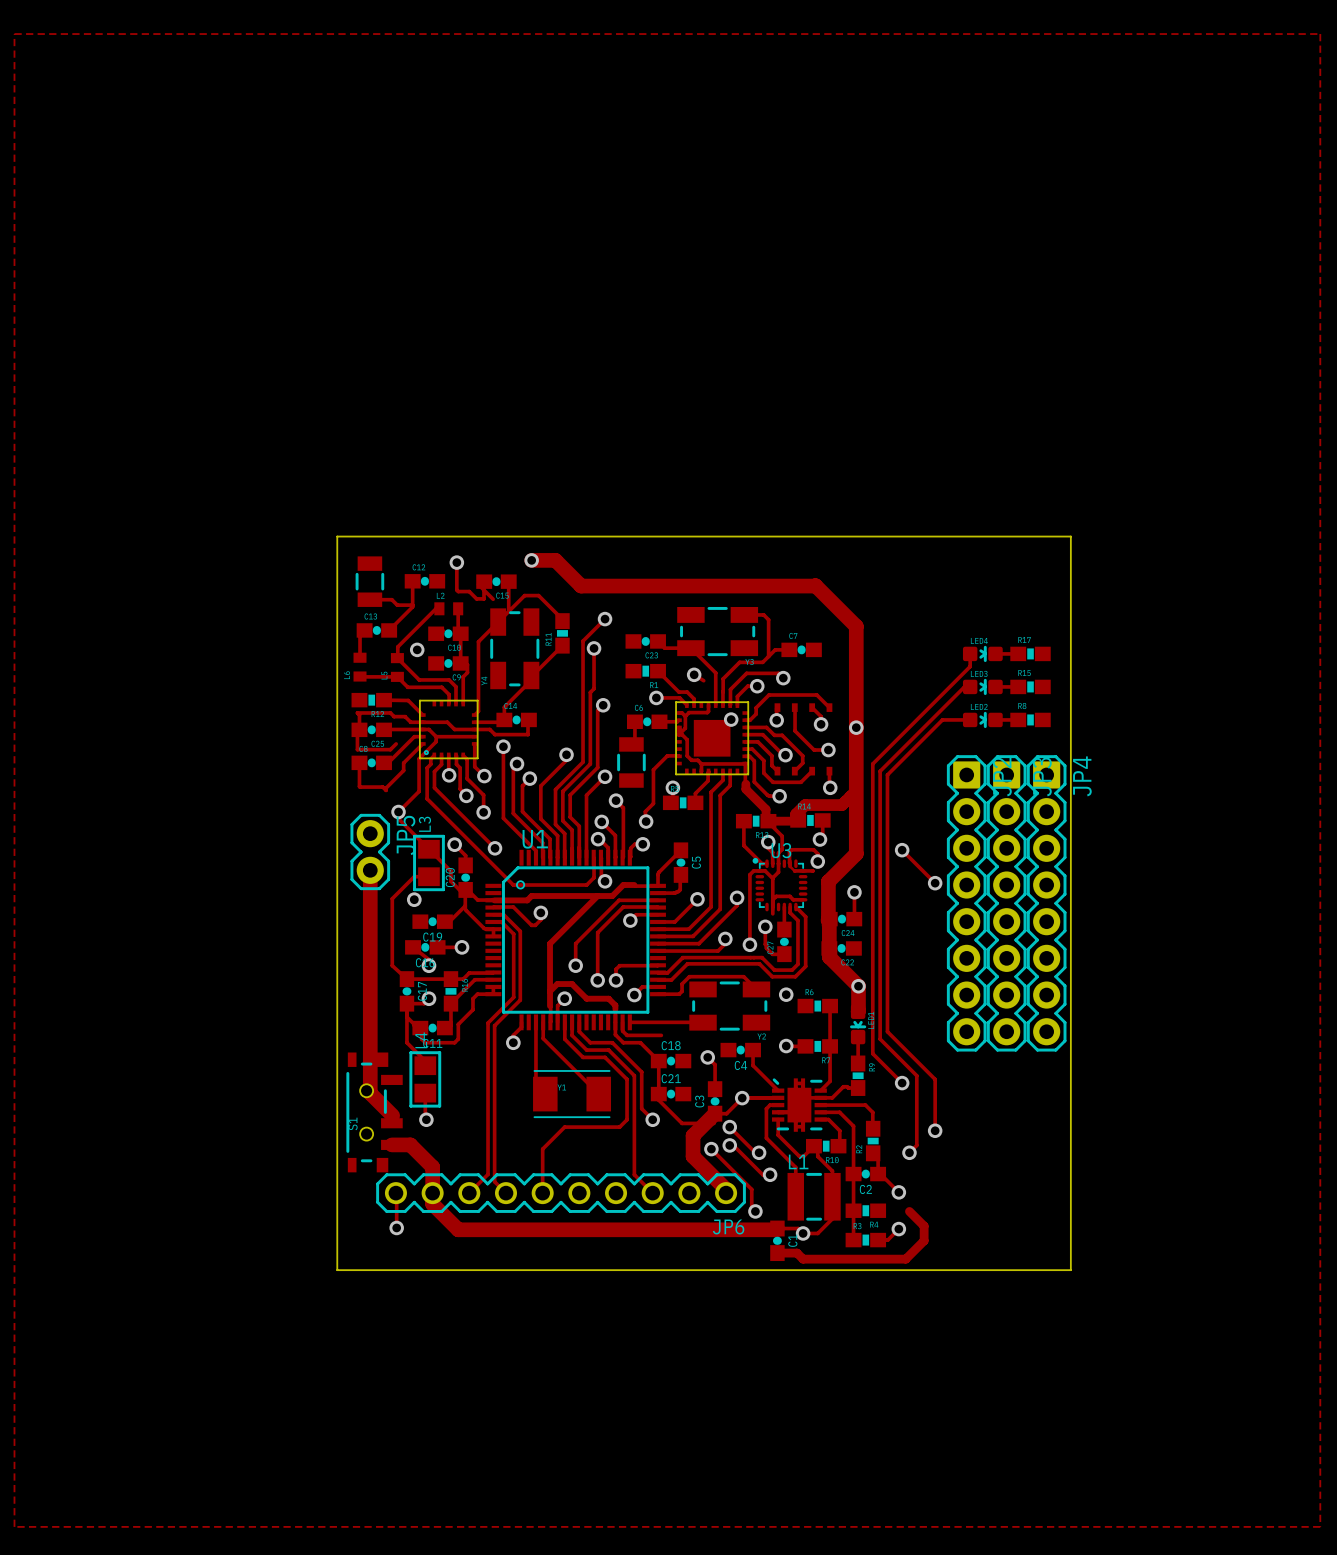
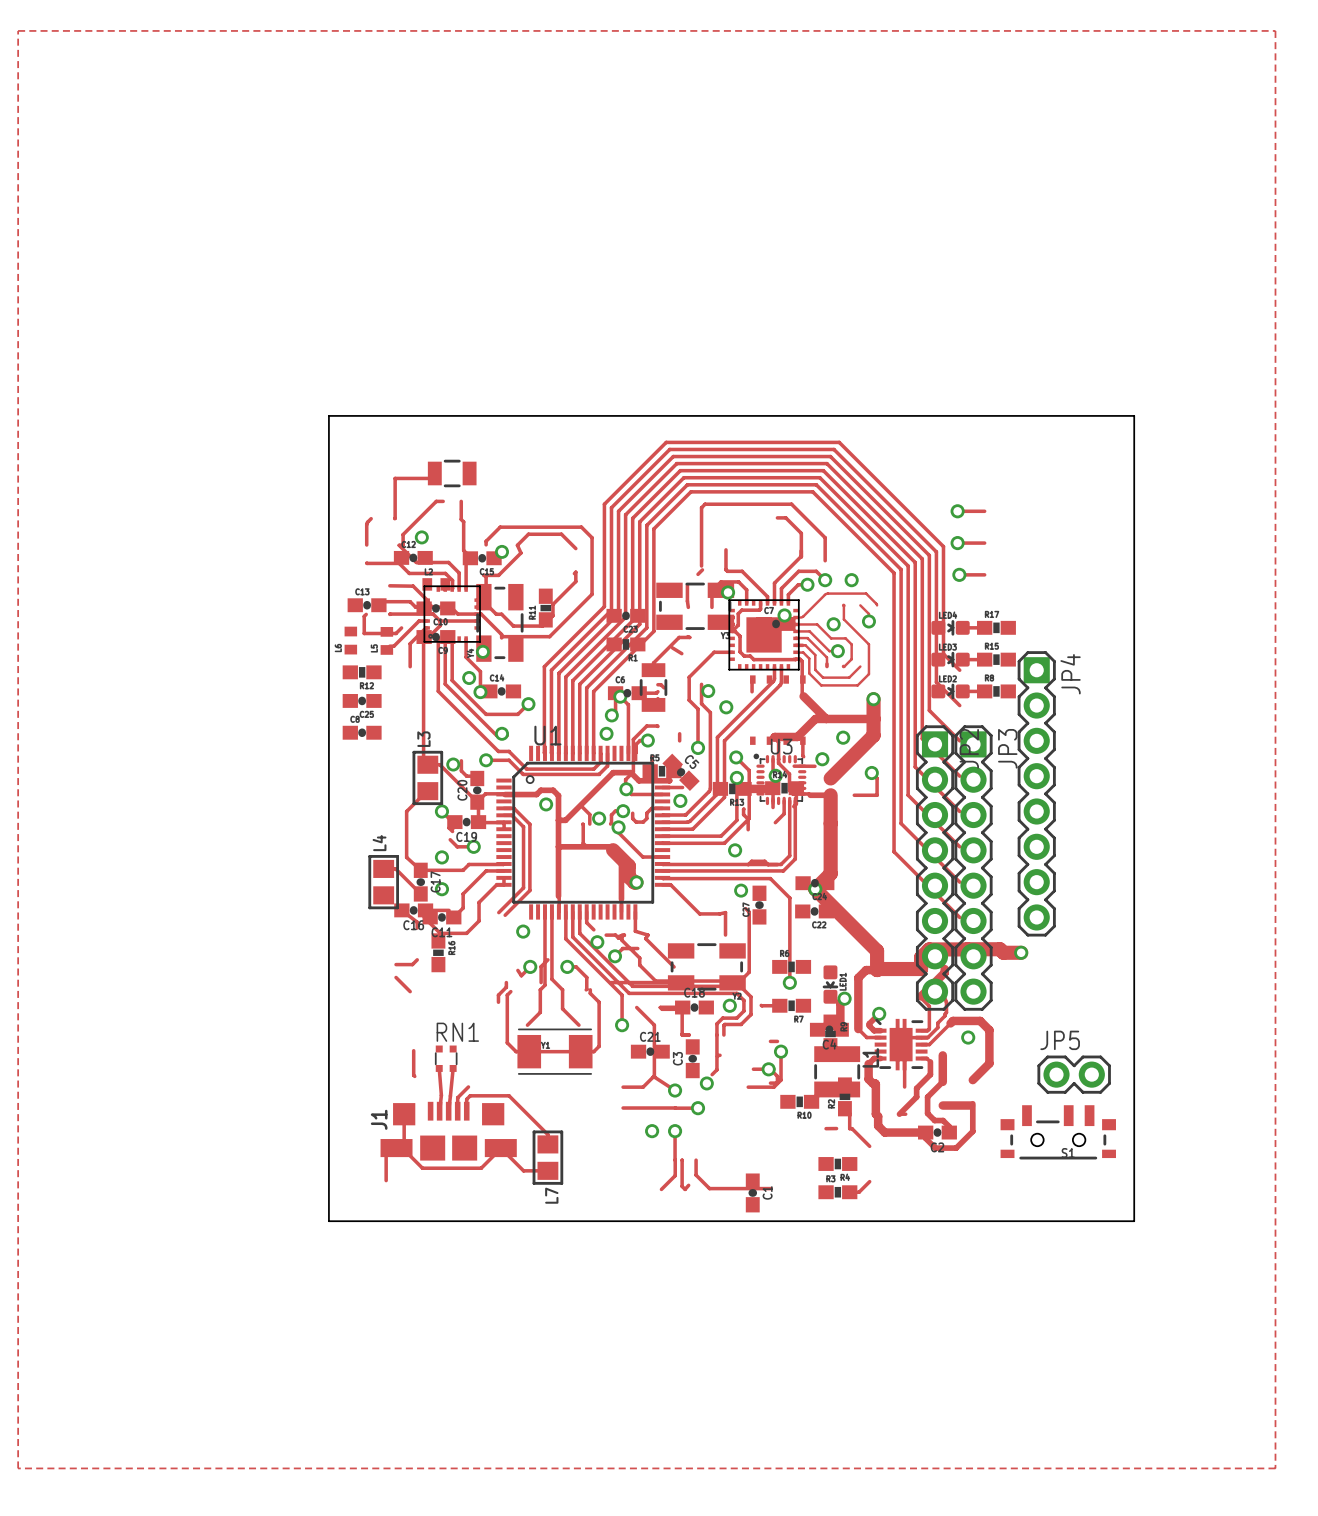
track: none -> (434, 473) (429, 478) (395, 478) (394, 518)
track: none -> (443, 501) (436, 501) (403, 534) (403, 544) (399, 545) (416, 562) (448, 562) (459, 572) (459, 589)
track: none -> (461, 501) (463, 550) (466, 552) (466, 589)
track: none -> (957, 511) (984, 511)
via: none -> (957, 511)
board edge: (337, 536) (1070, 536) (1070, 1270) -> (328, 514) (328, 415) (1134, 415) (1134, 1221) (1035, 1221)
track: none -> (777, 517) (785, 517) (801, 533) (801, 556) (774, 583) (774, 602)
track: (531, 560) (555, 560) (581, 586) (815, 585) (856, 626) (856, 853) (828, 881) (828, 920) -> none
via position: (531, 560) -> (502, 551)
track: (456, 562) (458, 591) (469, 591) (476, 598) (483, 598) (483, 580) -> none
via position: (456, 562) -> (421, 537)
track: none -> (957, 543) (984, 543)
via: none -> (957, 543)
track: none -> (486, 544) (486, 541) (500, 527) (581, 527) (592, 537) (592, 594) (549, 636) (502, 636)
track: none -> (575, 548) (561, 534) (528, 534) (517, 545) (520, 553) (498, 575) (483, 575) (486, 576) (486, 597) (483, 600) (477, 600)
track: none -> (725, 549) (725, 569) (742, 571) (767, 596) (767, 602)
part rotation: 0° (369, 581) -> 90° clockwise (452, 473)
part position: (369, 581) -> (452, 473)
track: (412, 581) (412, 606) (389, 630) -> none
track: (508, 581) (508, 611) -> none
track: (478, 584) (493, 599) -> none
track: none -> (825, 560) (825, 537) (791, 504) (705, 504) (701, 507) (701, 566)
track: none -> (366, 563) (399, 563) (409, 573) (445, 573) (452, 580) (452, 589)
track: none -> (702, 569) (698, 574)
track: none -> (574, 573) (575, 572) (575, 581) (552, 604) (552, 615) (542, 626) (513, 626) (501, 614) (496, 614) (489, 607) (477, 607)
track: none -> (959, 574) (984, 574)
via: none -> (959, 574)
track: (369, 599) (391, 599) (397, 605) (412, 605) -> none
track: none -> (825, 580) (816, 571) (798, 571) (781, 588) (781, 602)
via: none -> (825, 580)
via: none -> (851, 580)
track: (439, 608) (435, 608) (397, 646) (397, 658) (419, 679) (449, 679) (456, 686) (456, 703) -> none
track: (458, 608) (460, 663) (467, 664) (467, 672) (463, 676) (463, 703) -> none
track: none -> (687, 584) (688, 607)
via: none -> (807, 584)
track: (744, 614) (763, 614) (768, 619) (768, 656) -> none
via: none -> (728, 592)
track: (605, 619) (583, 641) (583, 762) (555, 789) (555, 824) (564, 833) (564, 857) -> none
via: (605, 619) -> none
track: (562, 621) (538, 595) (524, 595) (478, 641) (478, 711) (474, 715) -> none
track: none -> (378, 601) (410, 601) (415, 607) (450, 607) (457, 614) (481, 614) (501, 634) (501, 637)
track: none -> (746, 602) (746, 589) (738, 581) (720, 581) (711, 590) (711, 607)
track: none -> (760, 602) (759, 610) (741, 610) (738, 613) (738, 625) (732, 631) (735, 631) (740, 636) (740, 651) (744, 656) (750, 656) (753, 659) (800, 659) (802, 661) (802, 694) (826, 718)
track: (364, 630) (360, 636) (360, 657) -> (371, 518) (366, 524) (366, 544)
track: none -> (843, 605) (843, 619) (868, 644) (868, 674) (857, 685) (821, 685) (809, 673) (809, 658) (803, 652) (796, 652)
track: none -> (877, 605) (866, 593) (827, 593) (800, 617)
track: none -> (366, 614) (364, 616) (364, 633) (396, 633) (401, 627)
track: (658, 641) (664, 648) (690, 648) (715, 672) (715, 705) -> none
via: none -> (784, 615)
track: (562, 645) (531, 675) (531, 680) (504, 707) (504, 719) (502, 722) (474, 722) -> none
track: none -> (440, 621) (440, 625) (423, 642) (423, 760) (427, 764) (439, 764) (478, 803) (479, 822) (504, 822)
via: none -> (868, 621)
track: (594, 648) (594, 688) (590, 692) (590, 763) (562, 791) (562, 820) (572, 830) (572, 857) -> none
via: (594, 648) -> none
via: (417, 649) -> none
track: (789, 649) (775, 649) (762, 662) (739, 662) (723, 678) (723, 691) -> none
track: none -> (796, 624) (817, 624) (831, 638) (845, 638) (851, 644) (851, 659) (843, 666)
via: none -> (833, 624)
track: (970, 653) (970, 666) (872, 763) (872, 1053) (902, 1083) -> none
track: none -> (427, 627) (410, 643) (410, 666)
track: none -> (796, 631) (809, 631) (829, 651) (837, 651)
track: none -> (687, 636) (689, 637) (679, 637) (653, 663) (653, 670) (660, 666)
track: none -> (796, 638) (807, 638) (826, 657) (826, 666) (826, 663)
track: none -> (438, 639) (438, 691) (498, 751) (509, 751) (526, 769) (593, 769) (600, 762) (600, 753)
track: none -> (445, 639) (445, 684) (496, 735) (507, 735)
track: none -> (452, 639) (452, 680) (486, 714) (517, 714) (528, 704)
track: none -> (466, 639) (466, 657) (480, 671) (480, 692)
track: (658, 671) (678, 692) (687, 692) (694, 698) (694, 705) -> none
track: none -> (796, 645) (805, 645) (815, 655) (815, 669) (823, 677) (849, 677) (860, 666)
via: (694, 674) -> none
track: (360, 676) (397, 676) (407, 687) (441, 687) (449, 694) (448, 703) -> none
via: none -> (482, 651)
track: (783, 678) (778, 673) (746, 673) (730, 689) (730, 705) -> none
via: (783, 678) -> none
via: none -> (837, 651)
track: none -> (732, 652) (714, 652) (689, 677) (689, 700) (698, 709) (698, 747)
track: (757, 686) (747, 686) (737, 696) (737, 705) -> (807, 584) (798, 584) (788, 594) (788, 602)
via: (757, 686) -> none
track: (970, 686) (964, 686) (880, 771) (880, 1039) (916, 1075) (916, 1145) (909, 1152) -> none
track: (722, 691) (722, 705) -> none
track: none -> (774, 666) (773, 681) (717, 737) (716, 794) (689, 821) (662, 822)
track: none -> (781, 666) (780, 684) (724, 740) (724, 797) (692, 829) (662, 829)
track: (656, 697) (679, 697) (686, 705) -> none
via: (656, 697) -> none
track: none -> (959, 670) (943, 653) (943, 546) (839, 442) (666, 442) (604, 504) (604, 606) (544, 666) (544, 753)
track: (384, 700) (408, 700) (422, 715) -> (389, 585) (413, 586) (427, 600)
track: (603, 705) (597, 710) (597, 767) (570, 795) (570, 817) (579, 826) (579, 857) -> none
via: (603, 705) -> none
track: (708, 705) (707, 712) (689, 712) (685, 716) (685, 728) (678, 734) (682, 734) (687, 739) (687, 755) (691, 760) (697, 760) (701, 763) (745, 763) (745, 789) (766, 809) (766, 818) (782, 836) (782, 849) (778, 853) (778, 872) (772, 877) (772, 913) -> none
via: none -> (469, 677)
track: (794, 707) (795, 730) (814, 750) (828, 750) -> none
track: (812, 707) (821, 716) (821, 724) -> (860, 605) (868, 613) (868, 621)
track: (829, 707) (816, 695) (768, 695) (756, 707) (756, 714) (750, 720) (745, 720) -> none
track: none -> (701, 684) (701, 703) (710, 712) (710, 789) (685, 815) (662, 815)
track: (528, 719) (528, 734) (494, 734) (489, 729) (454, 729) (447, 722) (410, 722) (405, 716) (394, 716) (390, 712) (357, 712) (359, 715) (357, 749) (390, 749) (396, 743) -> none
track: (970, 719) (942, 719) (887, 774) (887, 1031) (935, 1079) -> (944, 997) (946, 1002) (945, 1015) (937, 1023) (937, 1027) (927, 1037) (904, 1037)
via: none -> (480, 692)
via: (776, 720) -> none
via: (821, 724) -> none
track: none -> (620, 696) (628, 704) (628, 753)
via: none -> (620, 696)
track: (745, 727) (766, 727) (774, 735) (782, 735) (802, 755) (802, 763) (794, 771) -> none
via: (856, 727) -> none
track: none -> (873, 699) (873, 735) (830, 778)
via: none -> (873, 699)
track: (384, 729) (428, 729) (436, 736) -> (389, 614) (433, 614) (440, 621)
part position: (448, 729) -> (452, 614)
via: none -> (528, 704)
track: (745, 734) (762, 734) (785, 755) -> none
track: none -> (959, 705) (936, 682) (936, 551) (834, 449) (669, 449) (611, 507) (611, 610) (551, 670) (551, 753)
track: (422, 736) (414, 736) (388, 762) (384, 762) -> (427, 621) (419, 621) (393, 646) (389, 646)
track: (436, 736) (474, 736) -> (440, 621) (477, 621)
track: (436, 736) (436, 741) (419, 758) (419, 791) (398, 812) (398, 818) (450, 871) (450, 881) (459, 889) (467, 890) (477, 900) (527, 900) (531, 896) (612, 896) (623, 885) (657, 886) (658, 873) (680, 850) -> none
via: none -> (726, 707)
part position: (712, 738) -> (764, 634)
track: (745, 741) (757, 741) (771, 755) (771, 765) (777, 771) (777, 768) -> none
track: (422, 743) (403, 763) (403, 770) (386, 790) (382, 787) (359, 786) (359, 762) -> none
track: (474, 743) (474, 766) (484, 776) -> none
via: none -> (611, 715)
track: (503, 746) (503, 818) (535, 850) (535, 857) -> none
via: (503, 746) -> none
track: none -> (873, 718) (815, 718) (797, 736) (774, 737) (778, 742) (778, 759)
track: (745, 749) (752, 749) (763, 760) (763, 773) (773, 782) (800, 782) (812, 771) -> none
via: (828, 750) -> none
track: (566, 754) (566, 760) (540, 785) (540, 818) (557, 835) (557, 857) -> none
via: (566, 754) -> none
track: (434, 755) (427, 767) (427, 798) (513, 885) (586, 885) (594, 877) (593, 857) -> none
track: (441, 755) (441, 764) (434, 771) (434, 787) (494, 848) -> none
track: (448, 755) (449, 775) -> none
track: (456, 755) (456, 764) (460, 767) (460, 788) (466, 795) -> none
track: (463, 755) (467, 759) (467, 778) (483, 795) (483, 812) -> none
via: (785, 755) -> none
track: (745, 756) (749, 756) (754, 761) (754, 781) (768, 795) (779, 796) -> none
part position: (631, 762) -> (653, 687)
track: (517, 763) (513, 767) (513, 813) (542, 842) (543, 857) -> none
via: none -> (606, 733)
via: none -> (843, 737)
track: none -> (647, 740) (640, 740) (636, 744) (635, 753)
track: (708, 771) (708, 780) (695, 793) (695, 802) -> none
track: (722, 771) (722, 780) (711, 792) (711, 907) (688, 929) (658, 929) -> none
track: (730, 771) (730, 785) (720, 795) (720, 909) (693, 936) (658, 936) -> none
track: none -> (959, 740) (929, 710) (929, 555) (830, 456) (673, 456) (618, 511) (618, 613) (558, 673) (558, 753)
via: (449, 775) -> none
via: (484, 776) -> none
track: (605, 776) (586, 795) (586, 857) -> none
via: (605, 776) -> none
track: (529, 778) (522, 785) (522, 811) (550, 839) (550, 857) -> none
via: (529, 778) -> none
via: none -> (698, 747)
track: none -> (565, 753) (565, 677) (625, 617) (625, 514) (676, 463) (826, 463) (922, 558) (922, 738) (959, 776)
track: none -> (572, 753) (572, 680) (632, 620) (632, 518) (680, 470) (823, 470) (915, 562) (915, 767) (959, 811)
track: none -> (579, 753) (579, 684) (639, 624) (639, 521) (683, 477) (819, 477) (908, 566) (908, 795) (959, 846)
track: none -> (586, 753) (586, 687) (646, 627) (646, 525) (687, 484) (816, 484) (901, 569) (901, 823) (959, 882)
track: none -> (593, 753) (593, 691) (653, 631) (653, 528) (690, 491) (812, 491) (894, 573) (894, 851) (959, 917)
track: none -> (607, 753) (607, 765) (599, 774) (523, 774) (509, 760) (486, 760)
via position: (672, 787) -> (647, 740)
via: (830, 787) -> none
track: none -> (736, 757) (749, 770) (749, 818) (724, 843) (662, 843)
via: none -> (736, 757)
track: none -> (773, 759) (773, 773) (775, 775)
track: none -> (778, 759) (778, 763) (789, 774) (789, 790) (792, 793) (830, 795) (830, 873) (815, 889) (877, 951) (877, 970)
via: none -> (822, 759)
via: none -> (486, 760)
track: (855, 791) (841, 805) (805, 805) (796, 814) (796, 820) -> none
track: none -> (461, 760) (461, 770) (466, 776) (474, 776)
via: (779, 796) -> none
track: none -> (794, 766) (814, 766)
track: (616, 800) (623, 807) (622, 857) -> none
via: (616, 800) -> none
track: none -> (871, 773) (877, 778) (877, 795) (854, 795)
via: none -> (871, 773)
via: none -> (775, 775)
track: none -> (736, 777) (736, 820) (721, 836) (662, 836)
via: none -> (736, 777)
via: (398, 812) -> none
via: (483, 812) -> none
track: none -> (669, 780) (639, 780) (630, 772) (613, 772) (565, 820) (558, 820)
track: none -> (662, 787) (682, 787)
track: (601, 821) (615, 835) (616, 857) -> none
via: (601, 821) -> none
track: none -> (626, 789) (631, 794) (662, 794)
track: (743, 821) (743, 845) (762, 863) (767, 863) -> none
track: none -> (427, 791) (406, 811) (406, 857) (420, 870) (463, 870) (468, 864) (503, 863)
track: none -> (773, 794) (773, 807)
via: none -> (680, 800)
track: none -> (784, 800) (784, 813) (775, 822)
track: none -> (789, 800) (789, 855) (781, 864) (662, 863)
track: none -> (795, 800) (795, 859) (783, 870) (662, 870)
track: none -> (477, 802) (485, 793) (536, 794) (540, 790) (553, 790) (558, 795) (558, 911)
JP5 name position: JP5 (406, 835) -> JP5 (1060, 1040)
via: none -> (546, 804)
via: (598, 839) -> none
via: (819, 839) -> none
track: none -> (503, 808) (513, 808) (529, 824) (529, 890) (505, 915)
track: none -> (662, 808) (651, 808) (646, 813) (646, 818) (643, 822) (636, 822) (632, 818) (632, 813)
via: (768, 842) -> none
via: (494, 848) -> none
track: none -> (503, 815) (511, 815) (523, 826) (523, 887) (498, 912)
track: (902, 850) (935, 883) -> none
via: (902, 850) -> none
JP5 rotation: 0° (370, 851) -> 90° clockwise (1074, 1074)
JP5 position: (370, 851) -> (1074, 1074)
via: none -> (599, 818)
track: none -> (504, 822) (503, 829)
track: none -> (618, 827) (618, 832) (642, 857) (662, 857)
via: none -> (618, 827)
track: (817, 861) (817, 853) (813, 849) (791, 849) (789, 851) (789, 863) (794, 871) -> none
via: (817, 861) -> none
C5 rotation: 0° (680, 862) -> 45° counterclockwise (681, 772)
C5 position: (680, 862) -> (681, 772)
L3 position: (428, 863) -> (427, 777)
track: (370, 870) (370, 1093) (392, 1115) (391, 1123) -> none
track: (794, 870) (812, 870) -> none
track: none -> (450, 839) (457, 846) (473, 846)
track: (680, 874) (680, 889) (678, 891) (658, 893) -> none
track: (428, 876) (414, 876) (392, 898) (392, 965) (406, 979) (463, 979) (469, 973) (493, 972) -> none
C20 position: (465, 877) -> (477, 790)
track: (772, 878) (765, 870) (753, 870) (749, 874) (749, 944) -> none
via: none -> (473, 846)
track: none -> (558, 846) (609, 846) (621, 858) (621, 911)
via: (605, 881) -> none
via: (935, 883) -> none
track: none -> (613, 850) (628, 865) (628, 876) (636, 882)
U3 position: (780, 884) -> (779, 779)
via: none -> (735, 850)
track: (465, 889) (465, 909) (484, 928) (493, 929) (493, 936) -> none
via: none -> (441, 857)
via: (854, 892) -> none
track: (597, 896) (550, 943) (550, 1022) -> none
track: (737, 897) (737, 905) (698, 943) (658, 943) -> none
via: (737, 897) -> none
via: (414, 899) -> none
track: (697, 899) (674, 921) (658, 921) -> none
via: (697, 899) -> none
track: (658, 900) (619, 900) (575, 943) (575, 965) -> none
JP4 position: (1046, 903) -> (1036, 793)
track: none -> (383, 868) (395, 868) (420, 893)
track: (465, 905) (450, 920) (444, 921) -> none
track: none -> (503, 870) (486, 870) (463, 893) (463, 908) (453, 917)
track: (493, 907) (513, 907) (531, 925) (535, 925) (540, 919) (540, 912) -> none
track: (658, 907) (623, 907) (597, 932) (597, 980) -> none
track: (784, 907) (784, 929) -> none
track: (790, 907) (790, 912) (797, 920) (797, 964) (792, 970) (774, 970) (762, 957) (682, 957) (667, 973) (658, 972) -> none
track: (795, 907) (805, 916) (805, 966) (795, 976) (772, 976) (759, 963) (687, 963) (671, 980) (658, 979) -> none
via: (540, 912) -> none
track: none -> (503, 877) (503, 884) (496, 884) (479, 902) (479, 920) (466, 933) (440, 933) (430, 923) (430, 917) (434, 918)
track: none -> (662, 877) (770, 878) (789, 898) (789, 982)
track: (493, 914) (503, 914) (520, 931) (520, 1000) (494, 1025) (494, 1181) (506, 1193) -> none
track: (658, 914) (636, 914) (630, 920) -> none
via: none -> (636, 882)
track: (829, 919) (829, 957) (858, 986) (858, 1011) -> none
via: (630, 920) -> none
track: none -> (662, 884) (670, 884) (699, 913) (725, 912) (725, 935)
C19 position: (432, 921) -> (466, 822)
track: (493, 921) (501, 921) (513, 934) (513, 997) (488, 1023) (488, 1174) (469, 1193) -> none
via: none -> (815, 889)
track: (765, 926) (766, 948) (772, 954) (784, 954) -> none
track: (725, 938) (725, 943) (718, 951) (658, 951) -> none
via: (725, 938) -> none
U1 position: (575, 940) -> (583, 832)
via: (749, 944) -> none
track: none -> (745, 908) (749, 912) (749, 972) (740, 981) (655, 981) (639, 965) (639, 958) (622, 940) (622, 935)
via position: (461, 947) -> (441, 889)
track: none -> (544, 911) (544, 985) (540, 989) (540, 1012) (527, 1025)
track: none -> (551, 911) (551, 979) (562, 989) (562, 1008) (578, 1025)
track: none -> (565, 911) (565, 938) (622, 995) (622, 1025)
track: none -> (572, 911) (572, 937) (629, 993) (736, 993) (743, 1000) (743, 1011) (736, 1018) (722, 1018) (716, 1023) (716, 1069) (712, 1074)
track: none -> (579, 911) (579, 933) (632, 986) (740, 986) (751, 996) (751, 1014) (741, 1024) (724, 1024) (723, 1035)
track: none -> (586, 911) (586, 922) (593, 929)
track: none -> (635, 911) (635, 931) (648, 935) (645, 938) (674, 967)
via: (428, 965) -> none
via: (575, 965) -> none
track: (658, 965) (619, 965) (616, 969) (616, 980) -> none
via: none -> (523, 931)
track: none -> (606, 935) (615, 935) (618, 938) (624, 935) (619, 936)
track: (493, 979) (474, 979) (450, 1003) (450, 1025) (444, 1028) -> none
via: (597, 980) -> none
track: (493, 986) (493, 994) (477, 994) (472, 998) (472, 1009) (458, 1024) (458, 1039) (454, 1042) (425, 1042) (421, 1039) (421, 1029) (414, 1024) -> none
via: (858, 986) -> none
track: none -> (967, 949) (1000, 949) (1003, 952) (1021, 952)
track: none -> (967, 949) (929, 949) (921, 957) (921, 969) (877, 970)
track: (756, 989) (743, 976) (689, 976) (682, 984) (682, 991) (679, 994) (658, 994) -> none
C17 position: (406, 991) -> (420, 882)
track: (550, 991) (557, 984) (572, 984) (586, 998) (608, 998) (615, 1005) (615, 1034) (623, 1042) (640, 1042) (658, 1061) (658, 1100) (682, 1123) (713, 1123) (715, 1113) -> none
via: none -> (1021, 952)
via: (786, 994) -> none
via: (428, 998) -> none
via: (564, 998) -> none
track: (404, 1001) (406, 1003) (406, 1042) (425, 1061) (425, 1065) -> none
track: none -> (530, 966) (521, 975) (517, 970)
via: none -> (530, 966)
track: none -> (567, 966) (576, 966) (586, 977) (586, 989)
via: none -> (567, 966)
track: (830, 1006) (830, 1081) (820, 1090) -> none
track: none -> (877, 970) (866, 970) (858, 977) (858, 1029) (866, 1037) (880, 1037)
track: none -> (945, 972) (944, 969) (944, 972) (921, 996) (929, 1006) (929, 1029) (921, 1030)
track: (535, 1022) (535, 1084) (545, 1094) -> none
track: (543, 1022) (543, 1038) (598, 1094) -> none
track: (564, 1022) (564, 1039) (583, 1057) (605, 1057) (627, 1079) (627, 1119) (619, 1127) (564, 1127) (542, 1149) (542, 1193) -> none
track: (572, 1022) (572, 1035) (586, 1050) (608, 1050) (634, 1075) (634, 1174) (652, 1193) -> none
track: (579, 1022) (579, 1031) (590, 1042) (612, 1042) (641, 1072) (641, 1108) (652, 1119) -> none
track: (622, 1022) (622, 1030) (627, 1035) (661, 1035) -> none
via: none -> (789, 982)
C11 position: (432, 1028) -> (441, 917)
track: none -> (590, 989) (590, 993) (599, 1002) (599, 1046) (593, 1051) (516, 1051) (507, 1042) (507, 995) (510, 991)
track: (858, 1037) (858, 1063) -> none
track: none -> (844, 998) (840, 1002) (841, 1029)
via: none -> (844, 998)
via: (513, 1042) -> none
via: none -> (729, 1005)
via: (786, 1046) -> none
track: none -> (636, 1007) (654, 1025) (654, 1075) (643, 1087) (623, 1087)
track: none -> (680, 1007) (682, 1009) (662, 1009) (660, 1007) (682, 1007) (682, 1035) (689, 1035)
C4 position: (740, 1050) -> (829, 1029)
track: (753, 1050) (753, 1065) (778, 1090) -> none
track: none -> (879, 1013) (869, 1025) (874, 1030) (880, 1030)
via: none -> (879, 1013)
track: (707, 1057) (715, 1064) (715, 1097) -> none
via: (707, 1057) -> none
C18 position: (671, 1061) -> (694, 1007)
via: none -> (622, 1025)
L4 position: (425, 1079) -> (383, 882)
via: none -> (968, 1037)
via: (902, 1083) -> none
track: none -> (921, 1044) (929, 1044) (953, 1020) (980, 1020) (989, 1030) (989, 1063) (972, 1080)
track: (858, 1088) (843, 1086) (832, 1097) (806, 1097) -> none
track: none -> (781, 1051) (781, 1080) (773, 1087) (748, 1087)
via: none -> (781, 1051)
track: (778, 1097) (742, 1097) (726, 1113) (715, 1113) -> none
track: none -> (943, 1054) (942, 1081) (927, 1097) (927, 1113) (934, 1120) (943, 1120) (949, 1126) (949, 1132)
via: (742, 1098) -> none
RN1: none -> (446, 1058)
track: none -> (880, 1058) (874, 1058) (868, 1064) (868, 1079) (875, 1084) (875, 1114) (878, 1116) (878, 1125) (884, 1132) (925, 1132) (925, 1138) (935, 1148) (956, 1148) (972, 1131) (972, 1103) (971, 1105) (942, 1105)
track: none -> (921, 1058) (927, 1058) (930, 1061) (930, 1074) (916, 1088) (916, 1097) (899, 1114) (905, 1114)
track: (778, 1105) (770, 1105) (766, 1108) (766, 1138) (795, 1167) (795, 1196) -> none
part position: (799, 1105) -> (901, 1044)
track: (820, 1105) (865, 1105) (872, 1112) (873, 1128) (873, 1122) -> none
track: none -> (439, 1068) (441, 1095) (439, 1111)
track: none -> (453, 1068) (448, 1111)
S1 rotation: 0° (374, 1112) -> 90° counterclockwise (1058, 1132)
S1 position: (374, 1112) -> (1058, 1132)
via: none -> (768, 1069)
track: (820, 1112) (839, 1112) (853, 1126) (853, 1240) -> none
track: (715, 1113) (693, 1135) (693, 1156) (726, 1189) (726, 1193) -> none
via: (426, 1119) -> none
via: (652, 1119) -> none
track: (778, 1119) (778, 1135) (799, 1156) (803, 1156) (813, 1146) (817, 1150) (817, 1156) (832, 1171) (832, 1218) (817, 1233) (803, 1233) (798, 1228) (777, 1228) -> none
track: (820, 1119) (828, 1119) (839, 1130) (838, 1146) -> none
track: none -> (652, 1077) (675, 1090)
track: (729, 1127) (755, 1152) (759, 1152) -> none
track: none -> (468, 1086) (457, 1097) (457, 1111)
via: (935, 1130) -> none
via: none -> (675, 1090)
track: (391, 1144) (410, 1144) (432, 1167) (432, 1204) (458, 1229) (777, 1228) -> none
track: (729, 1145) (733, 1145) (762, 1174) (770, 1174) -> none
via: (729, 1145) -> none
track: (711, 1149) (751, 1189) (751, 1207) (755, 1211) -> none
via: (711, 1149) -> none
track: none -> (623, 1108) (675, 1108)
track: none -> (675, 1108) (698, 1108)
via: none -> (698, 1108)
via: (759, 1152) -> none
via: (909, 1152) -> none
track: none -> (466, 1111) (466, 1099) (470, 1095) (509, 1095) (547, 1134) (547, 1144)
track: none -> (404, 1114) (404, 1140) (396, 1148) (408, 1154) (422, 1168) (481, 1168) (500, 1148) (523, 1170) (547, 1170)
via: (770, 1174) -> none
C2 position: (865, 1174) -> (937, 1132)
J1: none -> (448, 1131)
via: none -> (652, 1131)
track: none -> (675, 1131) (675, 1159)
via: none -> (675, 1131)
via: (898, 1192) -> none
JP6: (561, 1193) -> none
L1 rotation: 0° (814, 1196) -> 90° clockwise (837, 1071)
L1 position: (814, 1196) -> (837, 1071)
L7: none -> (547, 1157)
track: none -> (675, 1160) (675, 1175) (661, 1189)
track: none -> (682, 1160) (682, 1186) (685, 1189) (688, 1185)
track: none -> (696, 1160) (696, 1175) (709, 1188) (771, 1188)
via: (755, 1211) -> none
track: (909, 1211) (924, 1226) (924, 1240) (905, 1259) (803, 1259) (797, 1253) (777, 1253) -> none
via: (396, 1227) -> none
via: (898, 1229) -> none
via: (803, 1233) -> none

